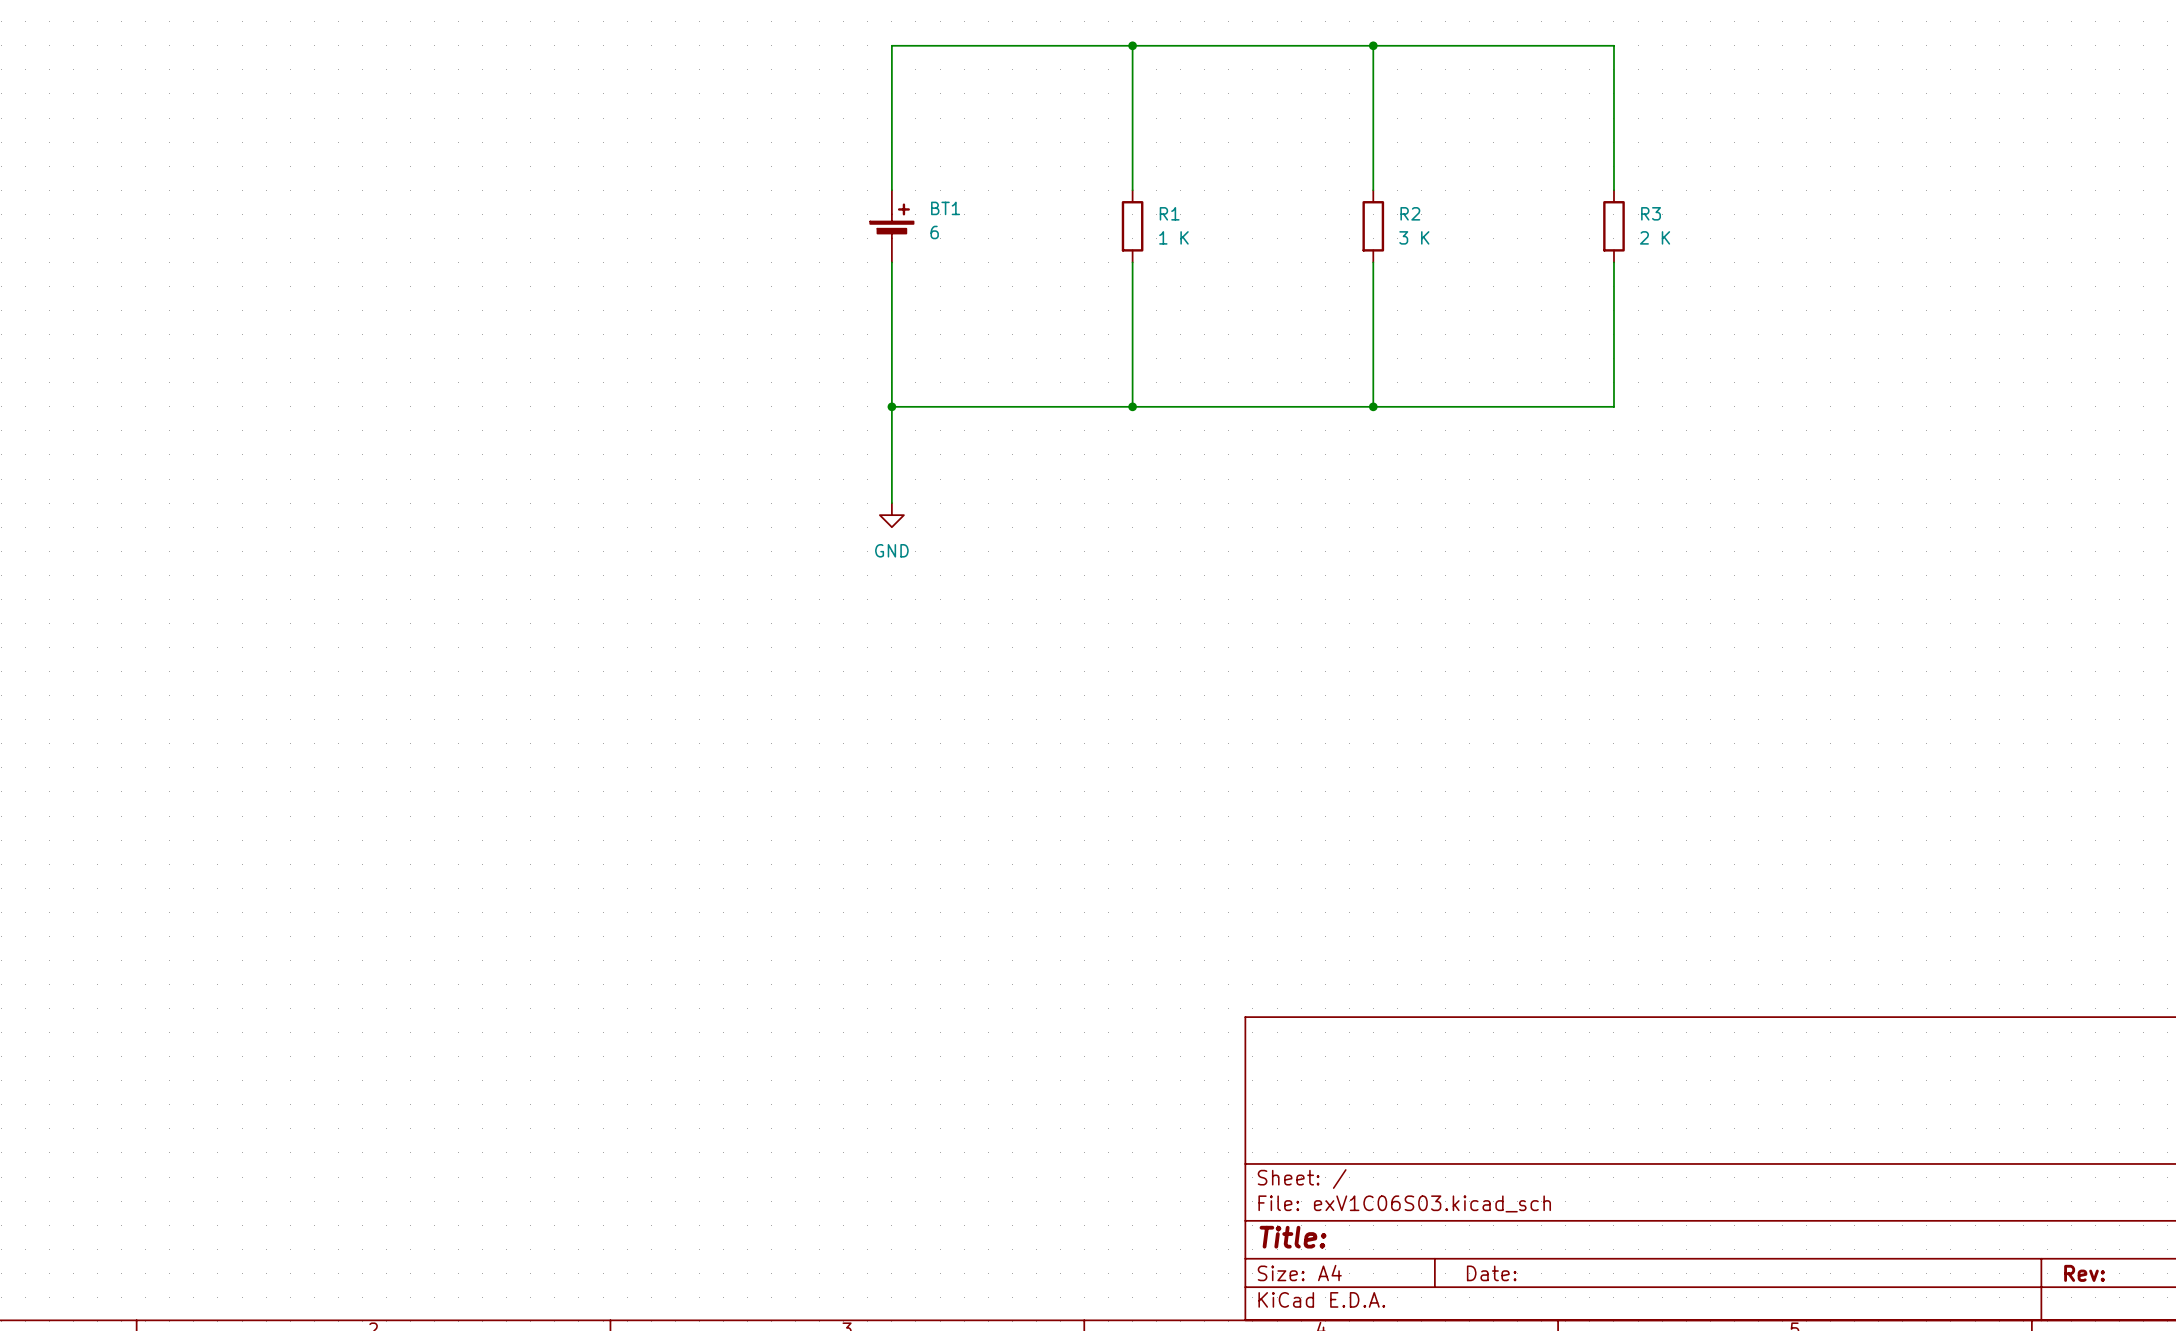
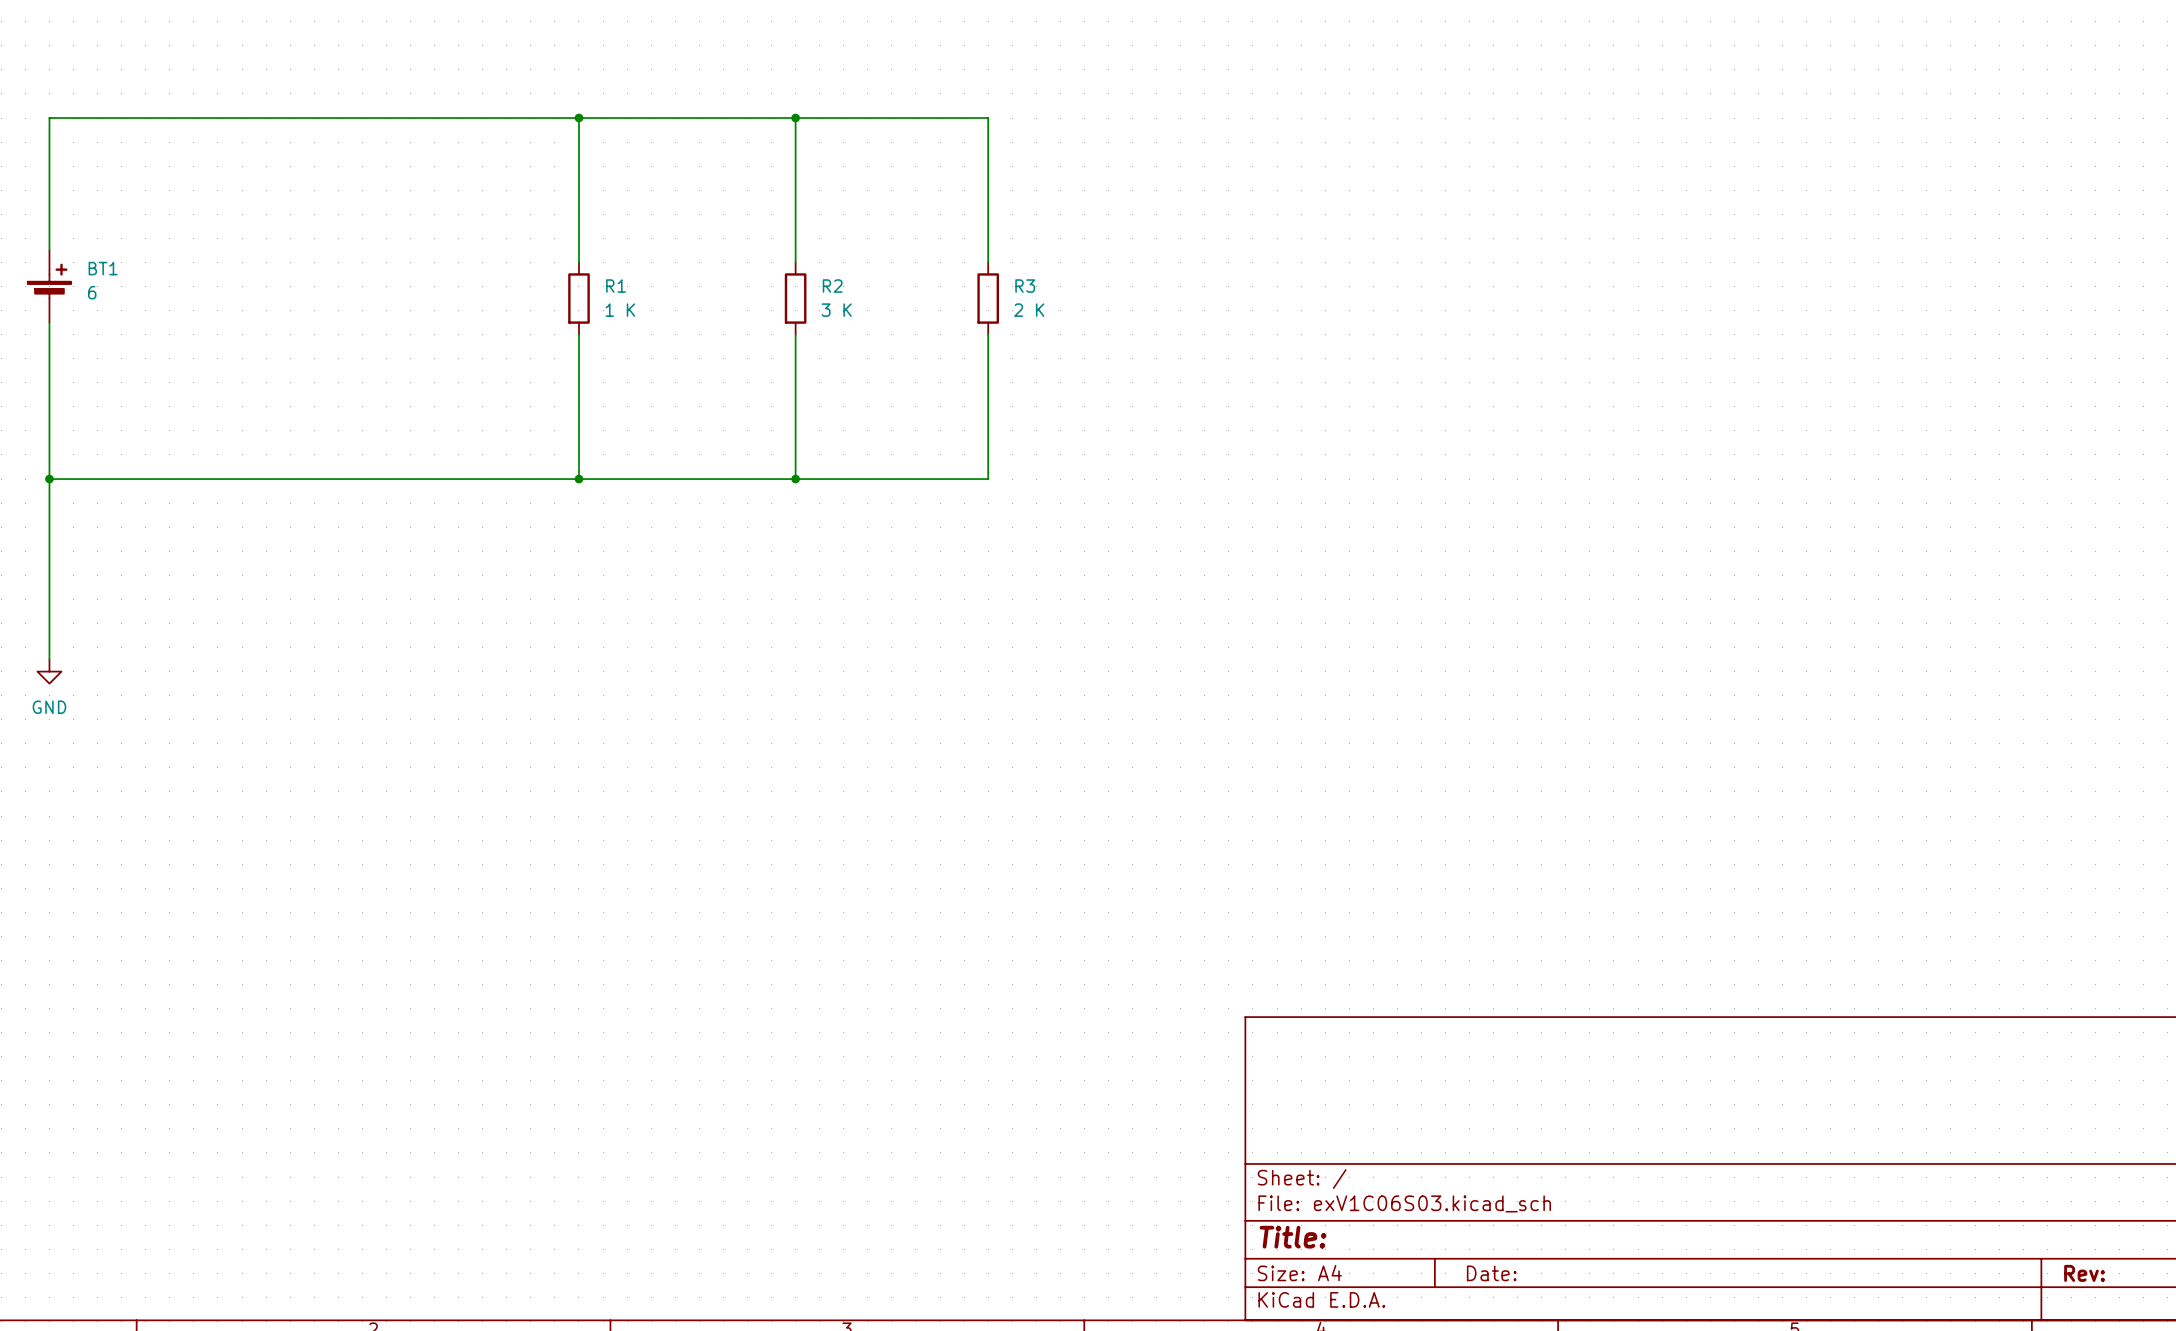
wire: (1132, 45) (1132, 190) -> none
junction: (1132, 45) -> none
wire: (1373, 45) (1373, 190) -> none
junction: (1373, 45) -> none
wire: none -> (578, 118) (578, 262)
junction: none -> (578, 118)
wire: none -> (795, 118) (795, 262)
junction: none -> (795, 118)
wire: (891, 190) (891, 45) (1613, 45) (1613, 190) -> none
BT1 position: (891, 226) -> (49, 286)
R1 position: (1132, 226) -> (578, 298)
R2 position: (1373, 226) -> (795, 298)
R3 position: (1613, 226) -> (988, 298)
wire: none -> (49, 250) (49, 118) (988, 118) (988, 262)
wire: (891, 262) (891, 503) -> none
wire: (1132, 262) (1132, 406) -> none
wire: (1373, 262) (1373, 406) -> none
wire: (1613, 262) (1613, 406) (891, 406) -> none
wire: none -> (49, 322) (49, 659)
wire: none -> (578, 334) (578, 479)
wire: none -> (795, 334) (795, 479)
wire: none -> (988, 334) (988, 479) (49, 479)
junction: (891, 406) -> none
junction: (1132, 406) -> none
junction: (1373, 406) -> none
junction: none -> (49, 479)
junction: none -> (578, 479)
junction: none -> (795, 479)
power symbol: GND (891, 515) -> none
power symbol: none -> GND (49, 671)

